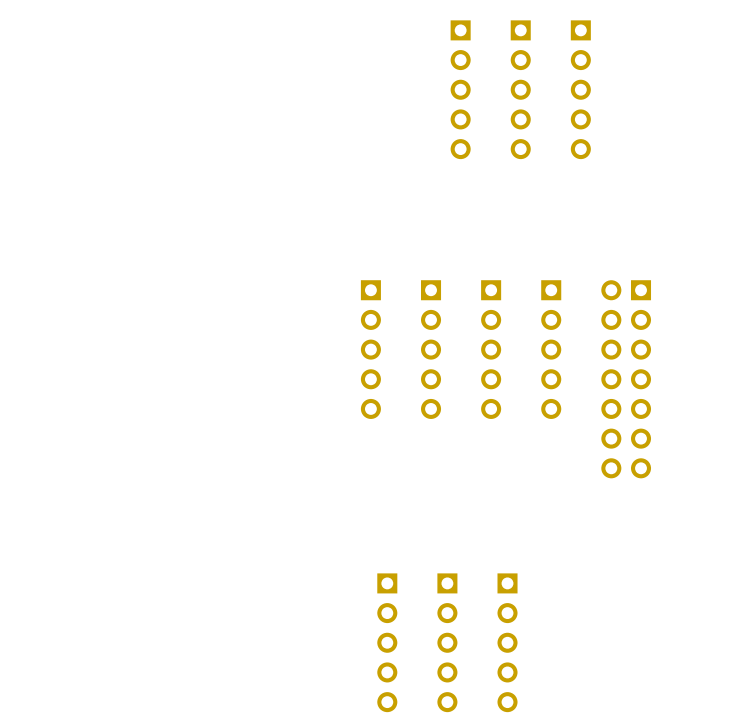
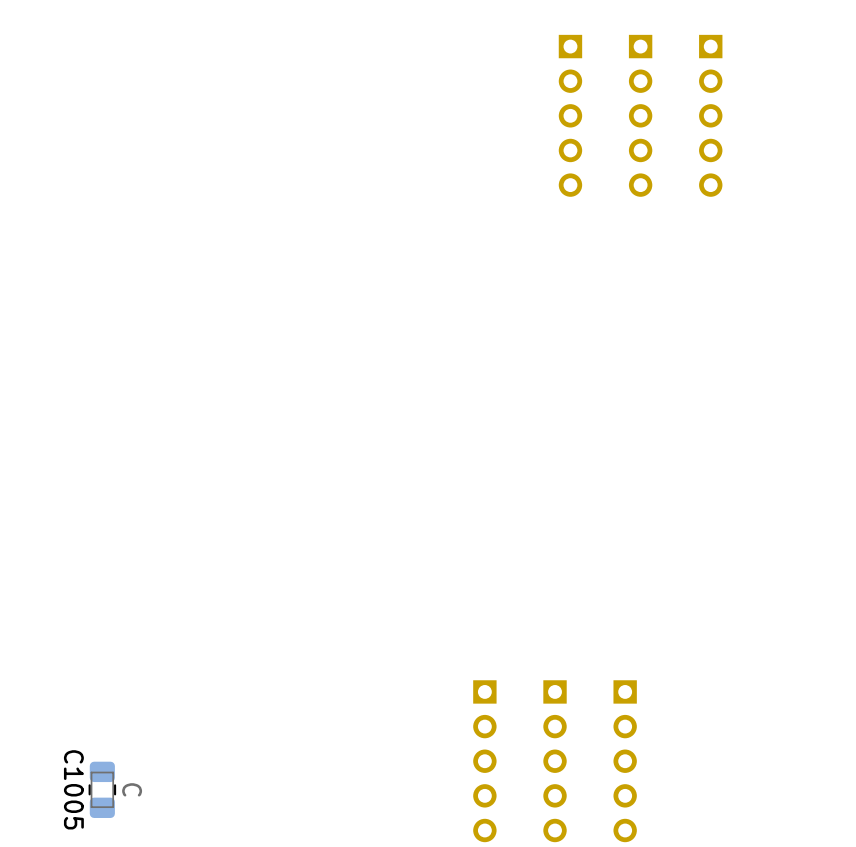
part: (370, 349) -> none
part: (431, 349) -> none
part: (491, 349) -> none
part: (551, 349) -> none
part: (626, 379) -> none
C1005: none -> C (102, 789)

